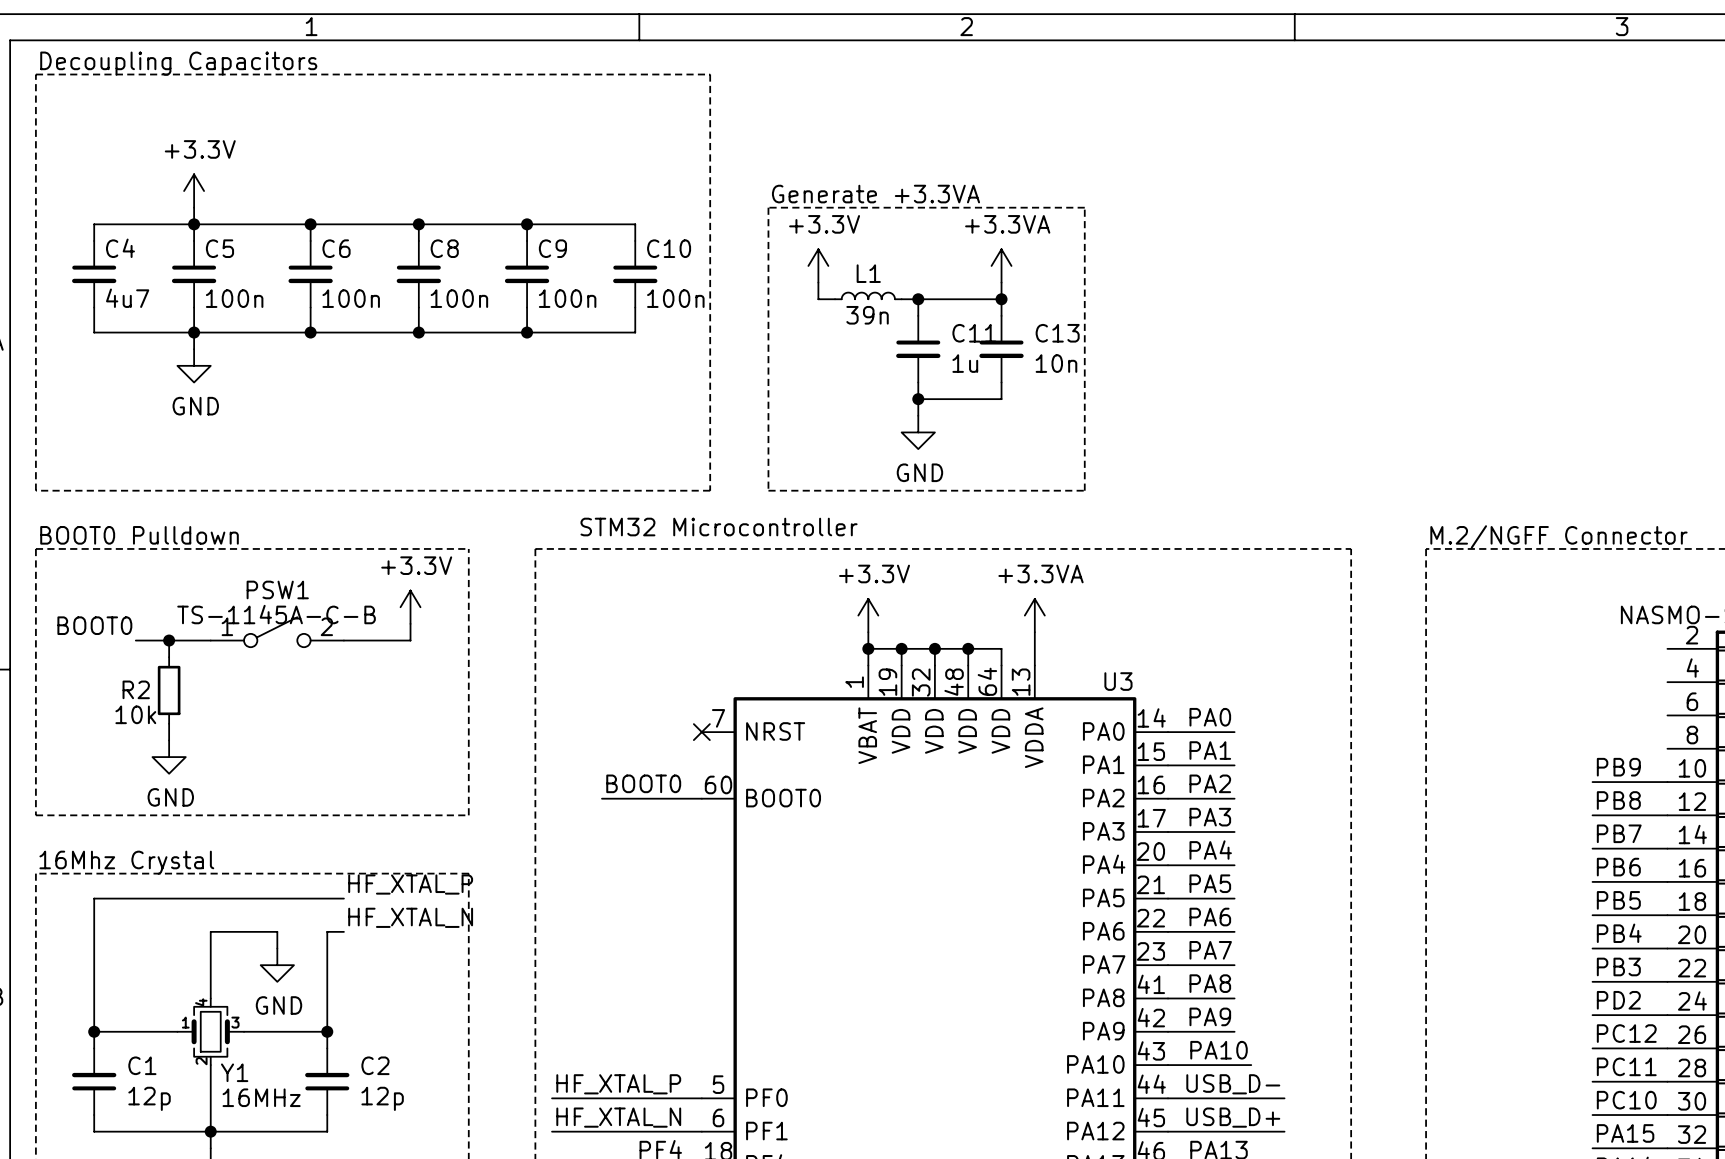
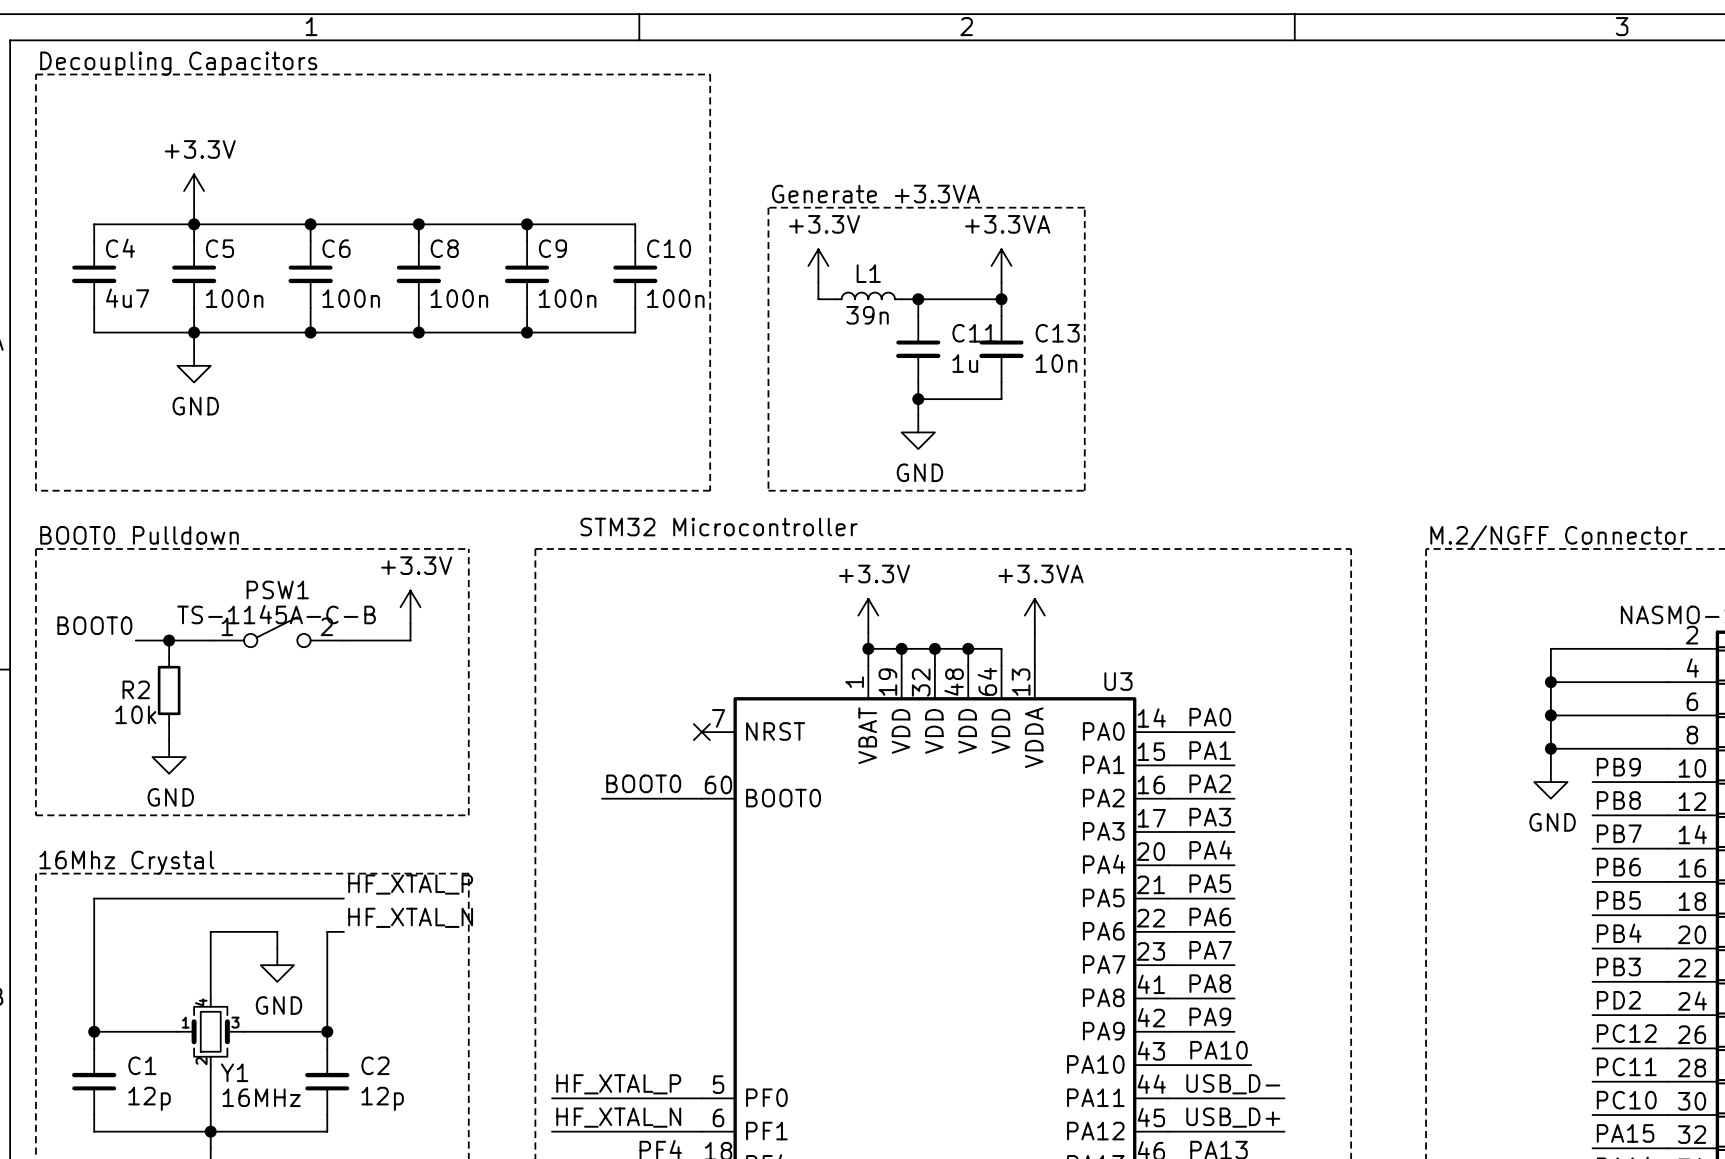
wire: none -> (1667, 648) (1550, 648) (1550, 765)
wire: none -> (1550, 682) (1667, 682)
junction: none -> (1550, 682)
wire: none -> (1550, 715) (1667, 715)
junction: none -> (1550, 715)
wire: none -> (1550, 748) (1667, 748)
junction: none -> (1550, 748)
power symbol: none -> GND (1550, 782)

